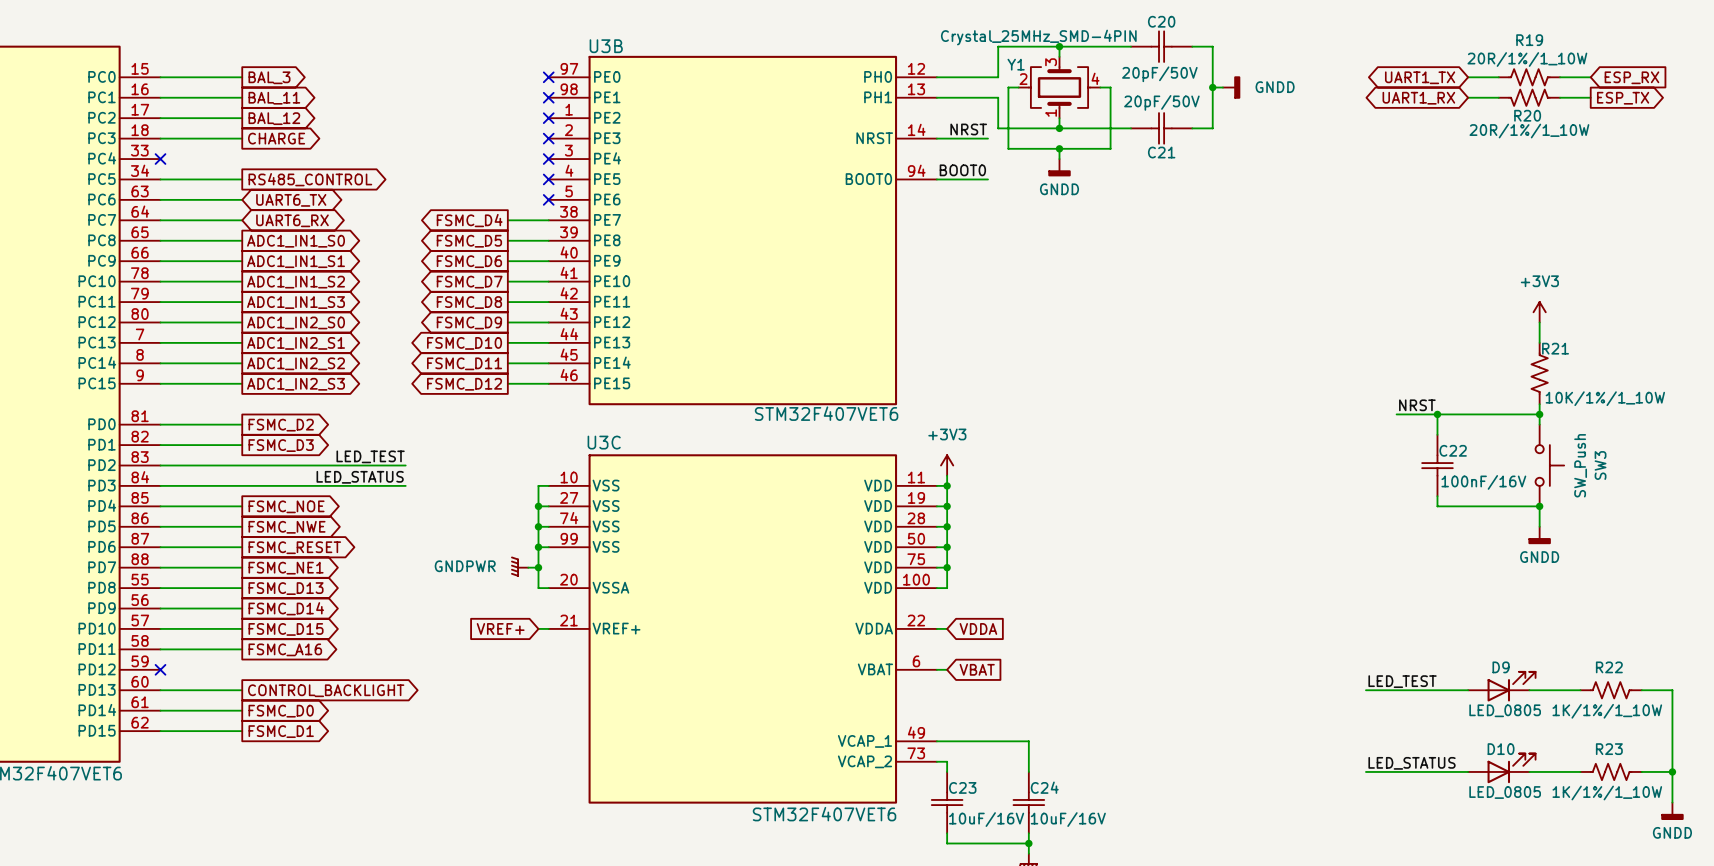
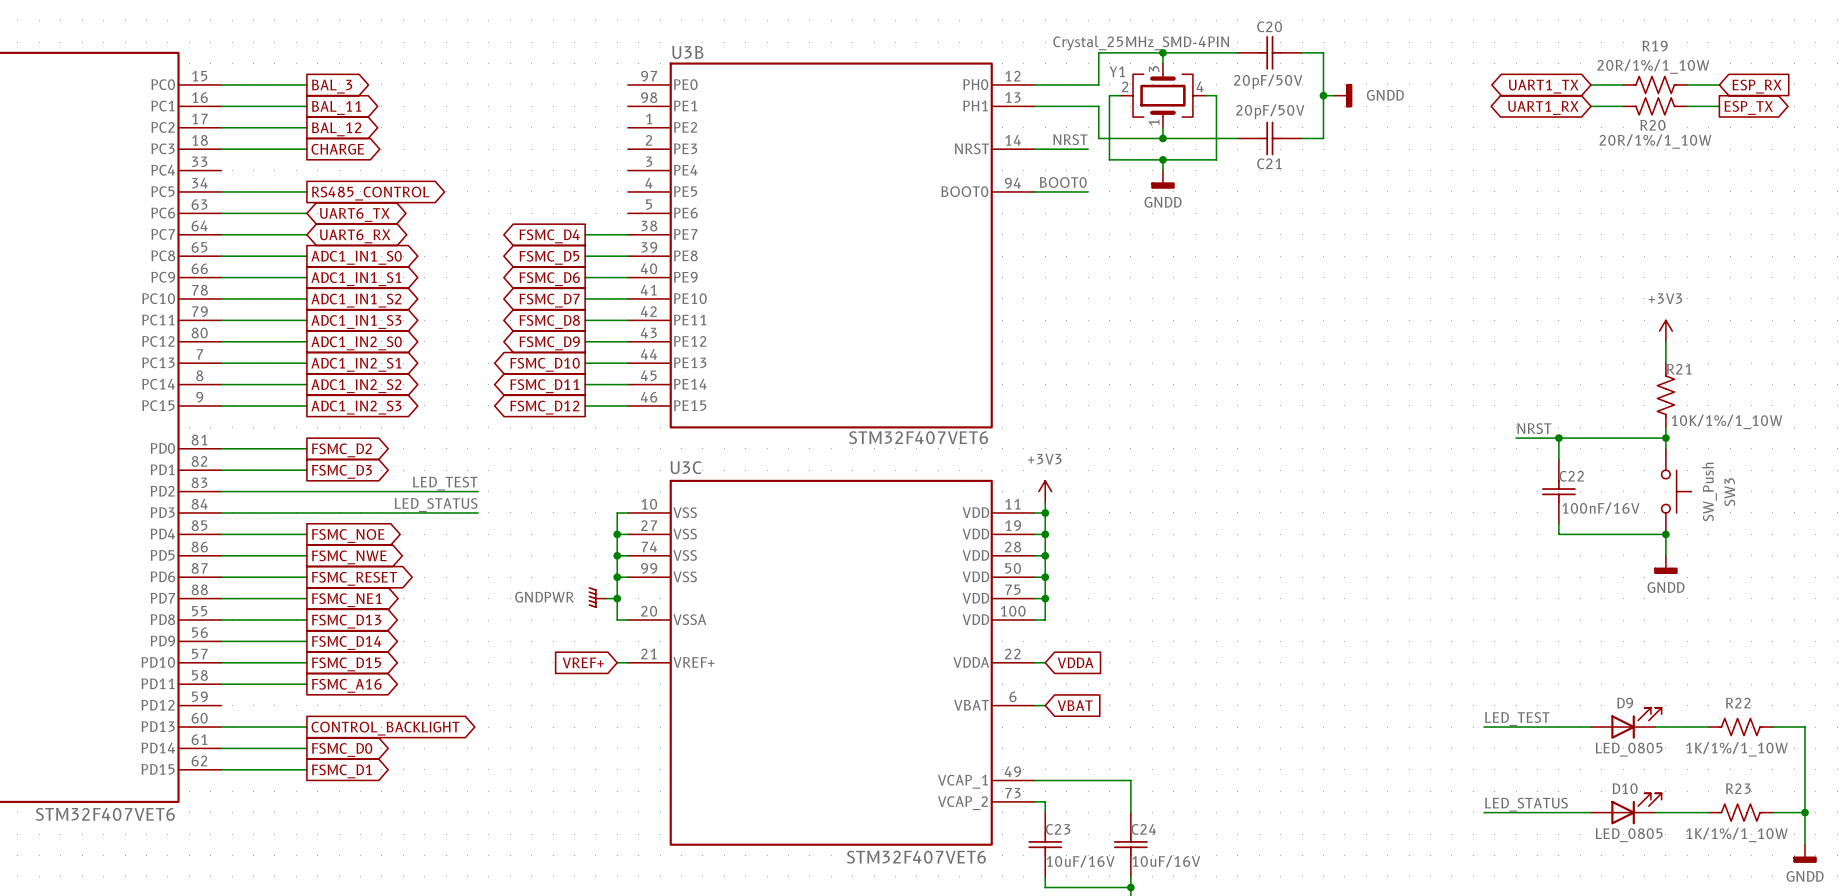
no-connect mark: (548, 77) -> none
no-connect mark: (548, 97) -> none
no-connect mark: (548, 118) -> none
no-connect mark: (548, 138) -> none
no-connect mark: (160, 159) -> none
no-connect mark: (548, 159) -> none
no-connect mark: (548, 179) -> none
no-connect mark: (548, 199) -> none
no-connect mark: (160, 669) -> none

